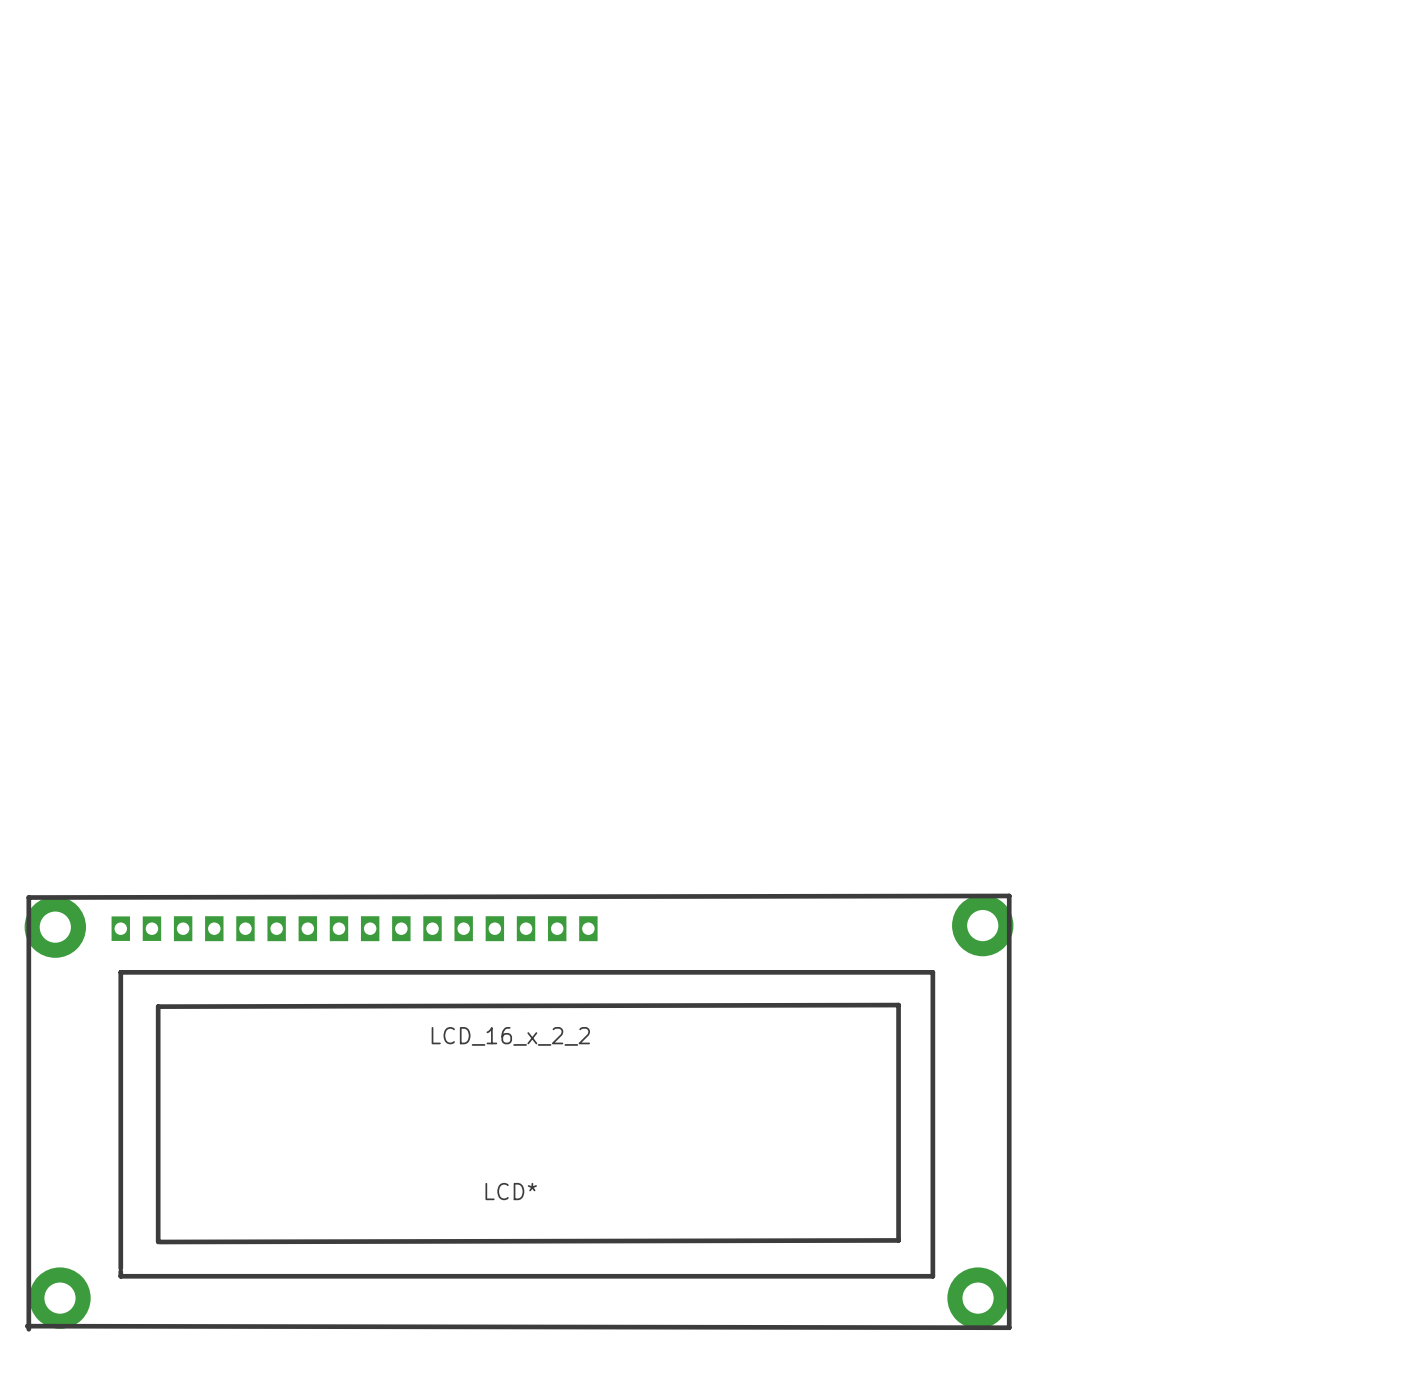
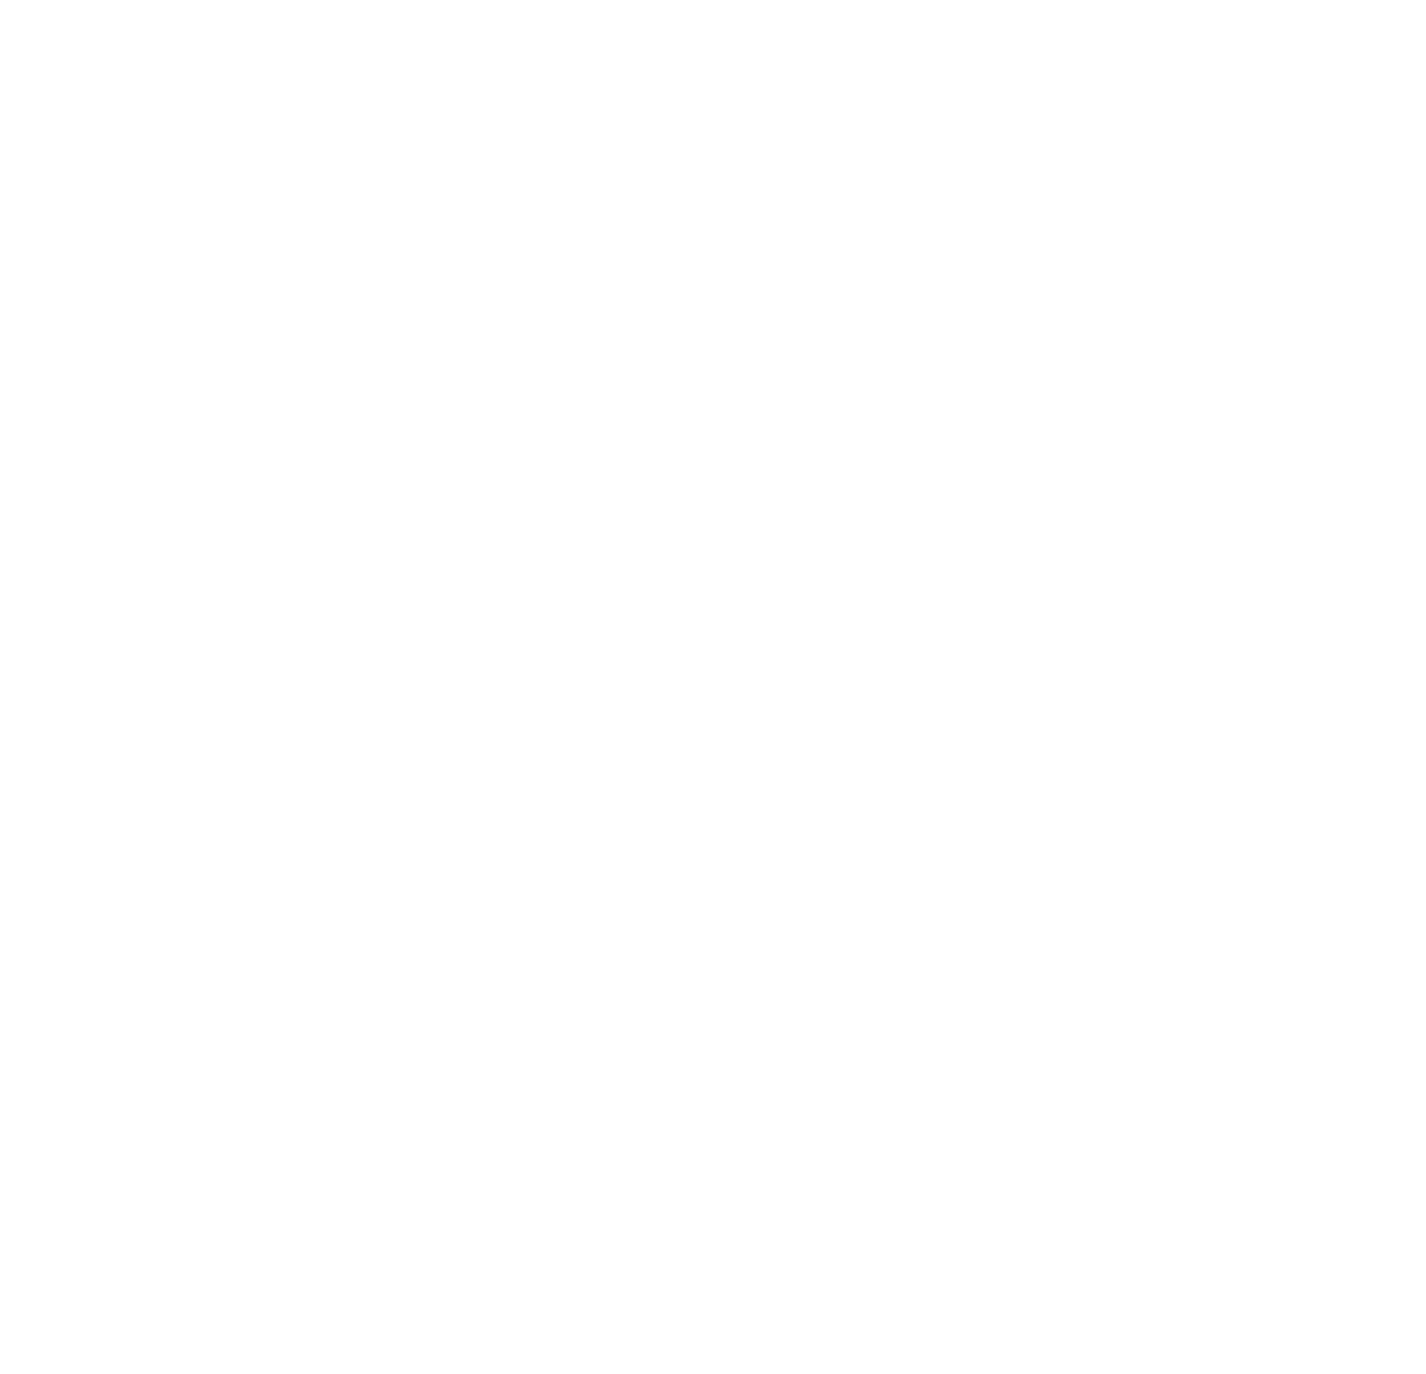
LCD*: LCD_16_x_2_2 (519, 1112) -> none

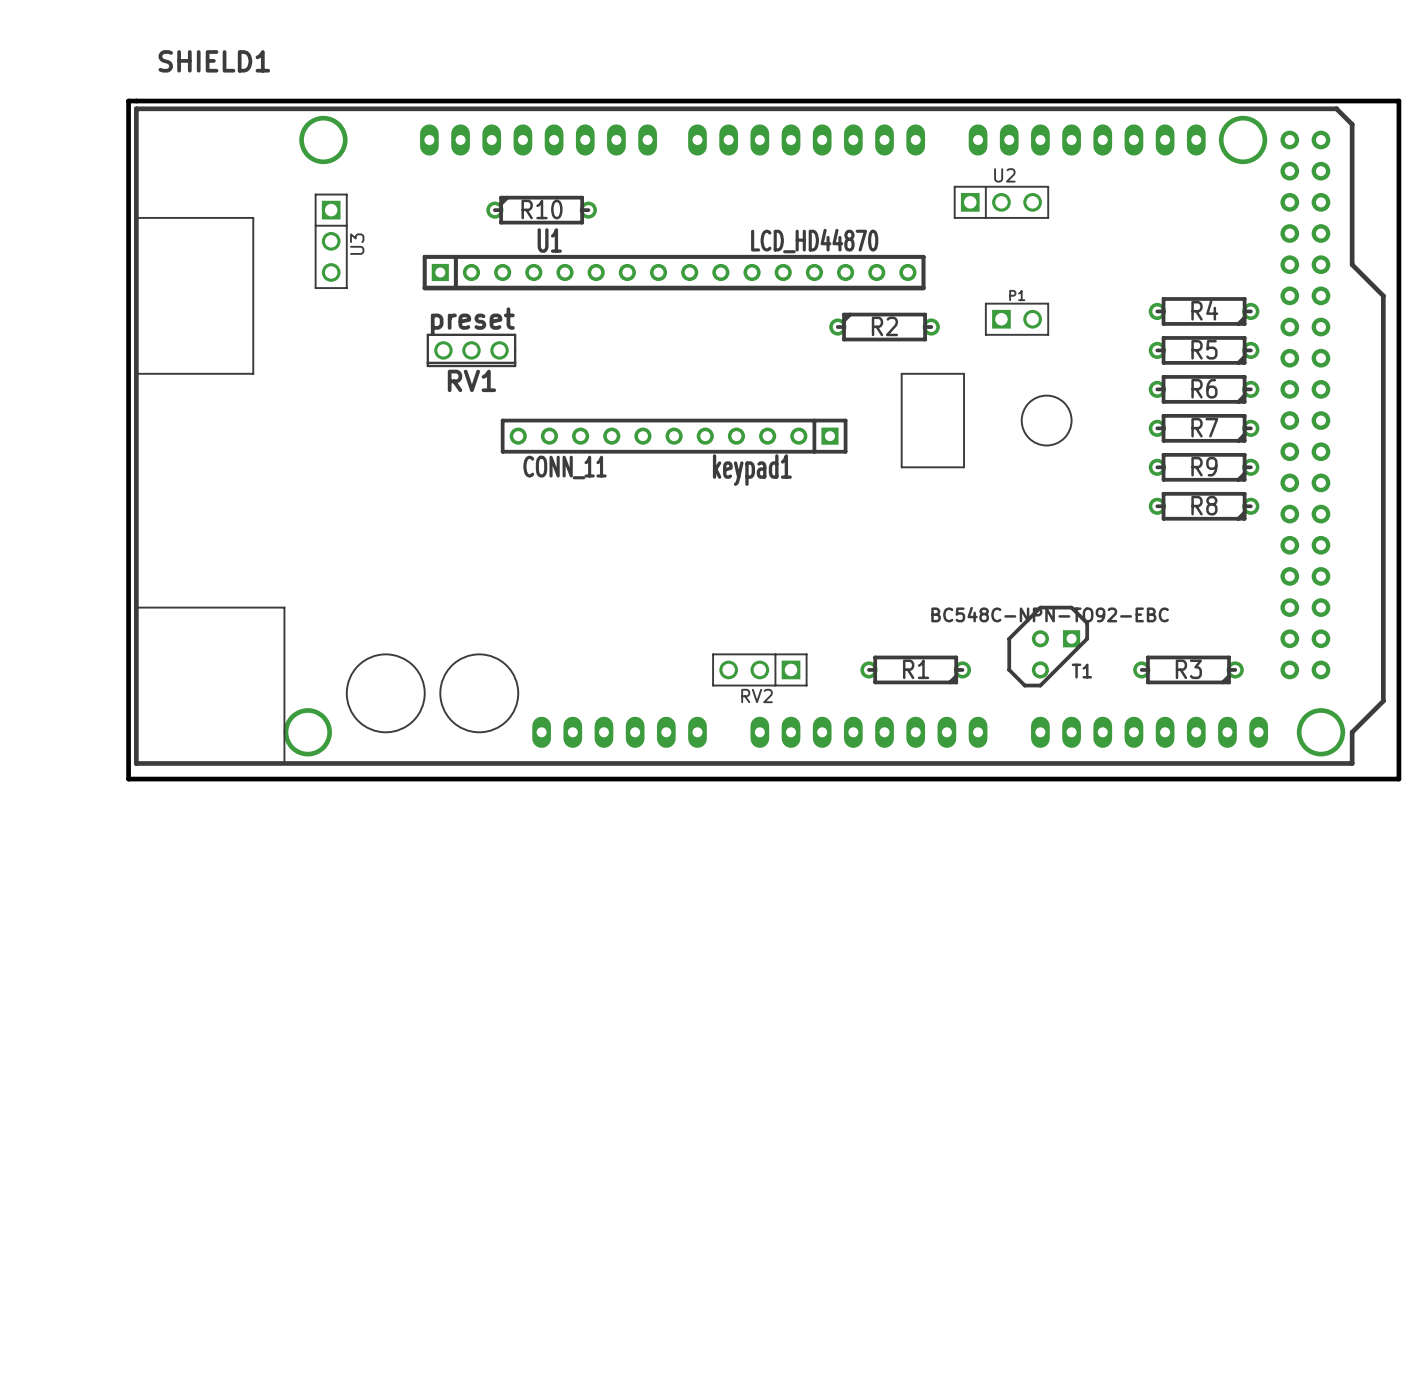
board edge: none -> (128, 101) (1398, 101) (1398, 779) (128, 779) (128, 101)
U2: none -> (1001, 202)
R10: none -> (541, 210)
U3: none -> (331, 241)
U1: none -> LCD_HD44870 (674, 272)
R4: none -> (1204, 311)
P1: none -> (1017, 319)
R2: none -> (884, 327)
RV1: none -> preset (471, 350)
R5: none -> (1204, 350)
R6: none -> (1204, 389)
R7: none -> (1204, 428)
keypad1: none -> CONN_11 (674, 436)
SHIELD1: none -> (759, 436)
R9: none -> (1204, 467)
R8: none -> (1204, 506)
T1: none -> BC548C-NPN-TO92-EBC (1048, 646)
RV2: none -> (759, 669)
R1: none -> (915, 669)
R3: none -> (1188, 669)

